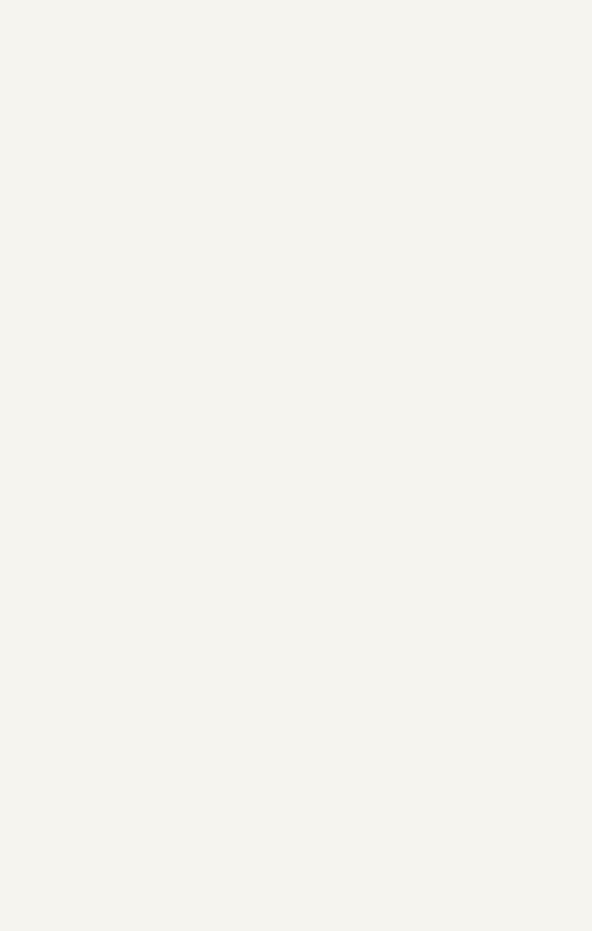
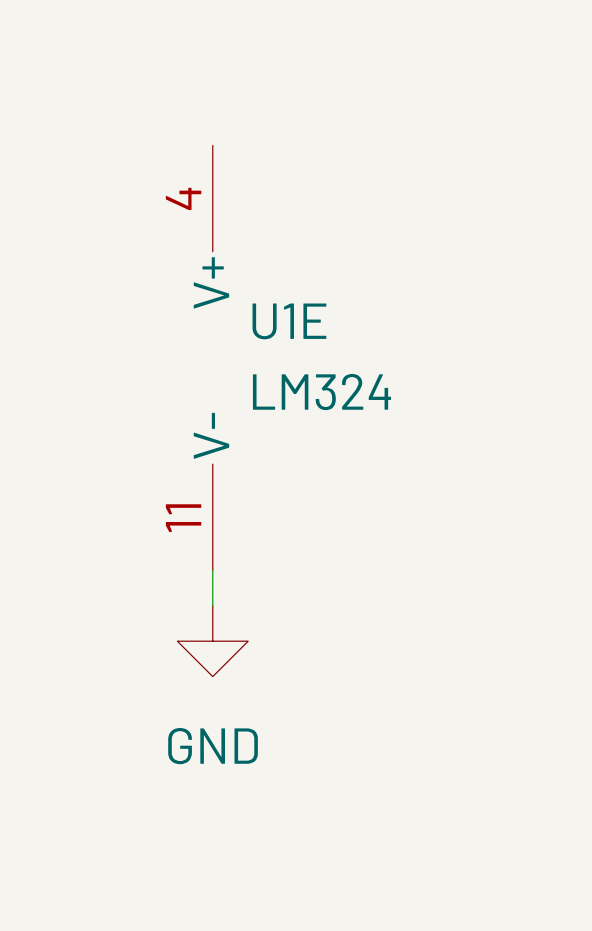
U1E: none -> LM324 (212, 357)
wire: none -> (212, 570) (212, 605)
power symbol: none -> GND (212, 641)

